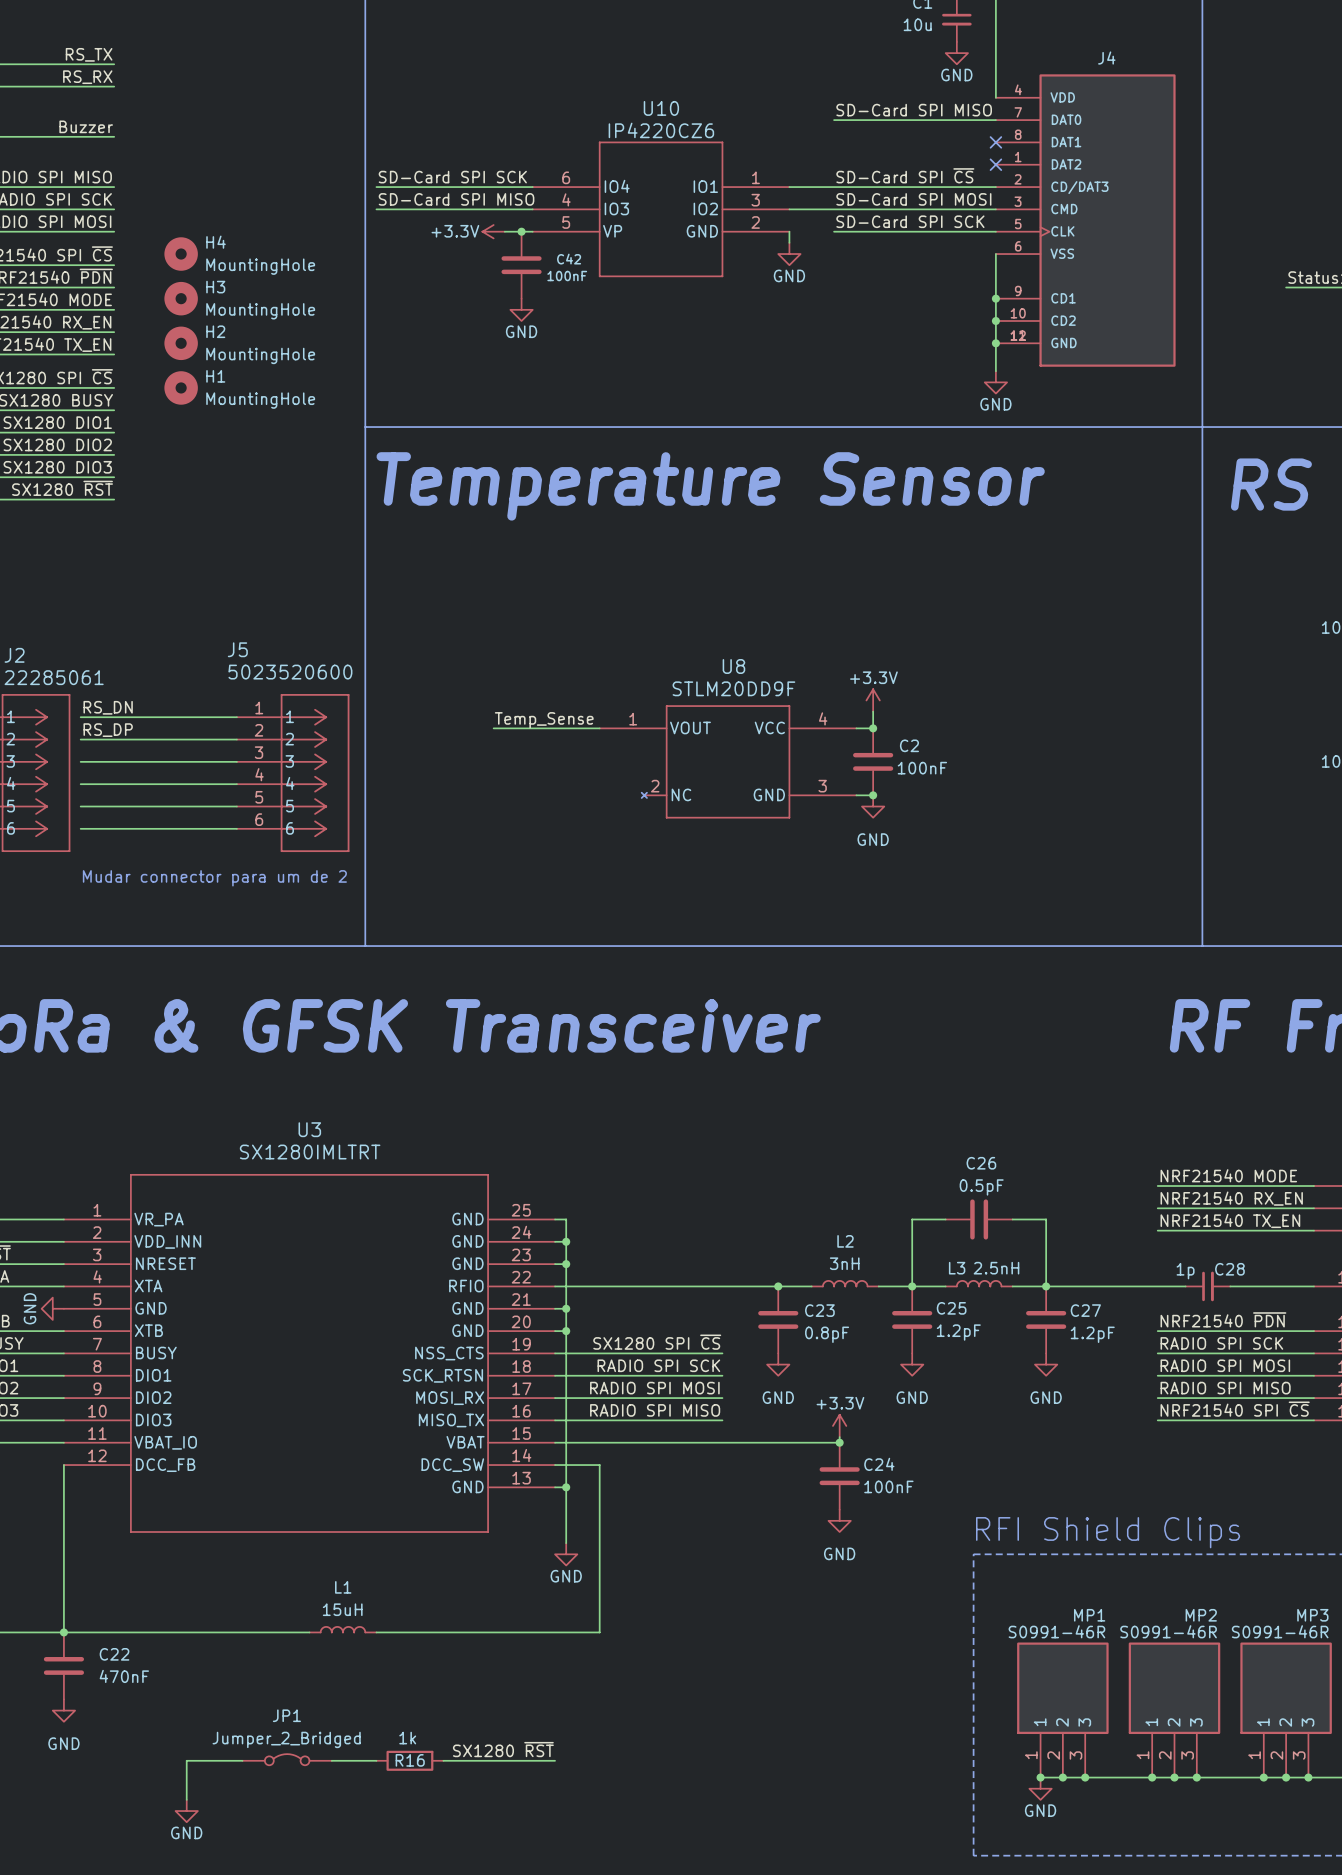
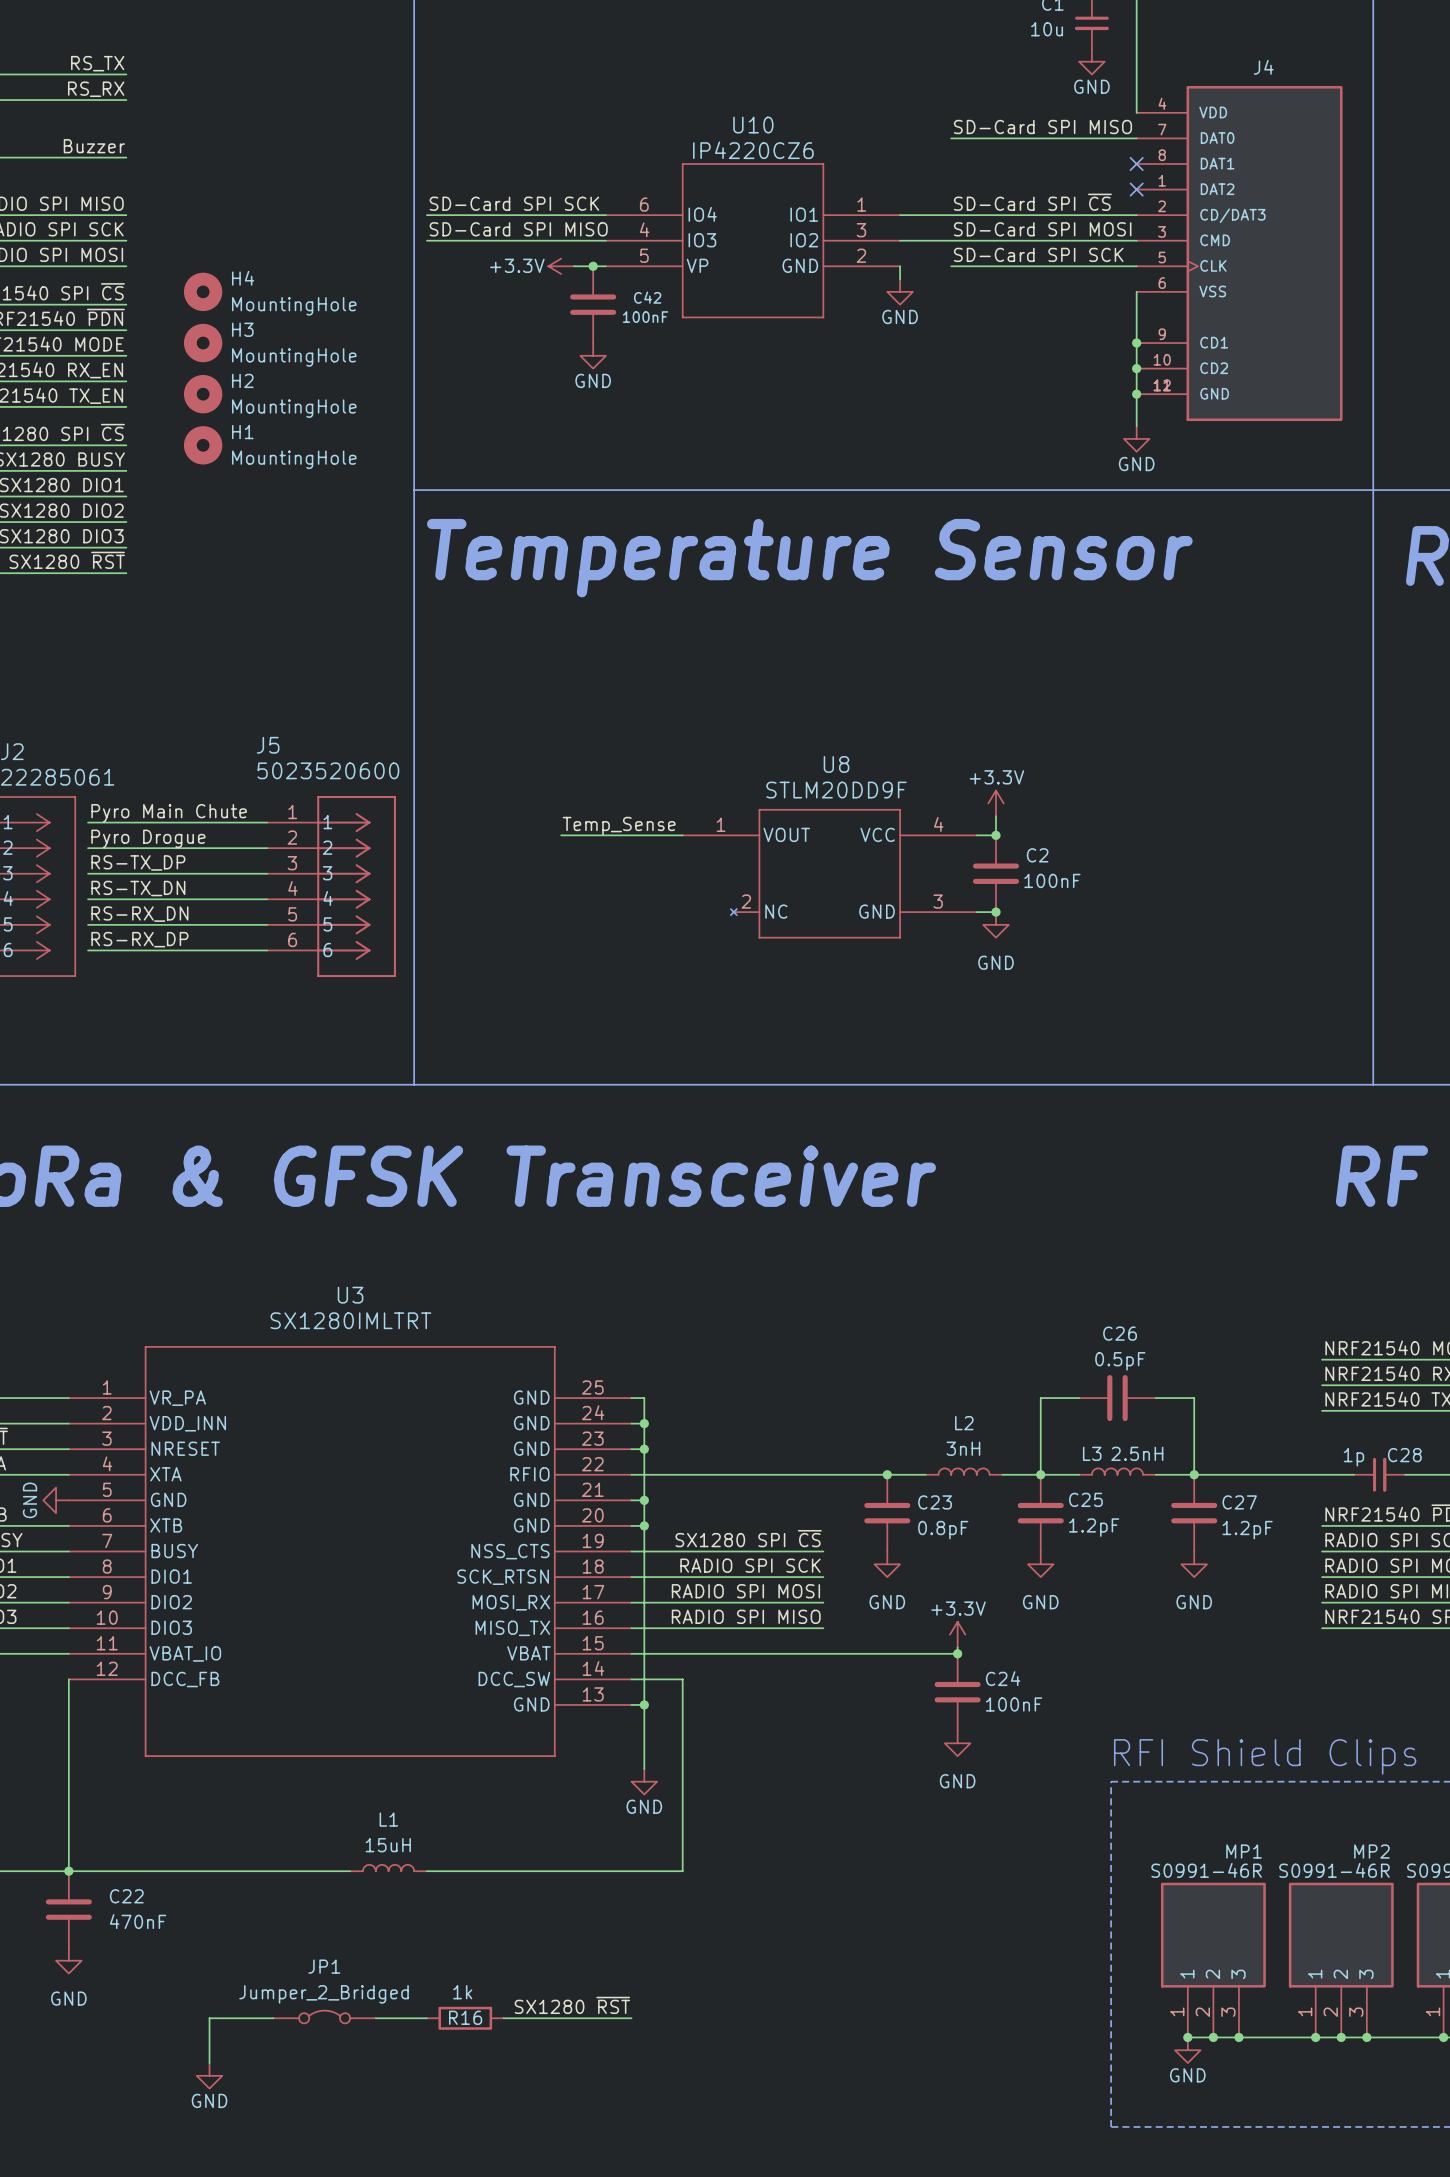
label: RS_DN (108, 707) -> Pyro Main Chute (169, 813)
label: RS_DP (108, 730) -> Pyro Drogue (148, 838)
label: none -> RS-TX_DP (138, 862)
label: none -> RS-TX_DN (138, 888)
label: none -> RS-RX_DN (139, 914)
label: none -> RS-RX_DP (139, 939)
text: Mudar connector para um de 2 (214, 878) -> none

